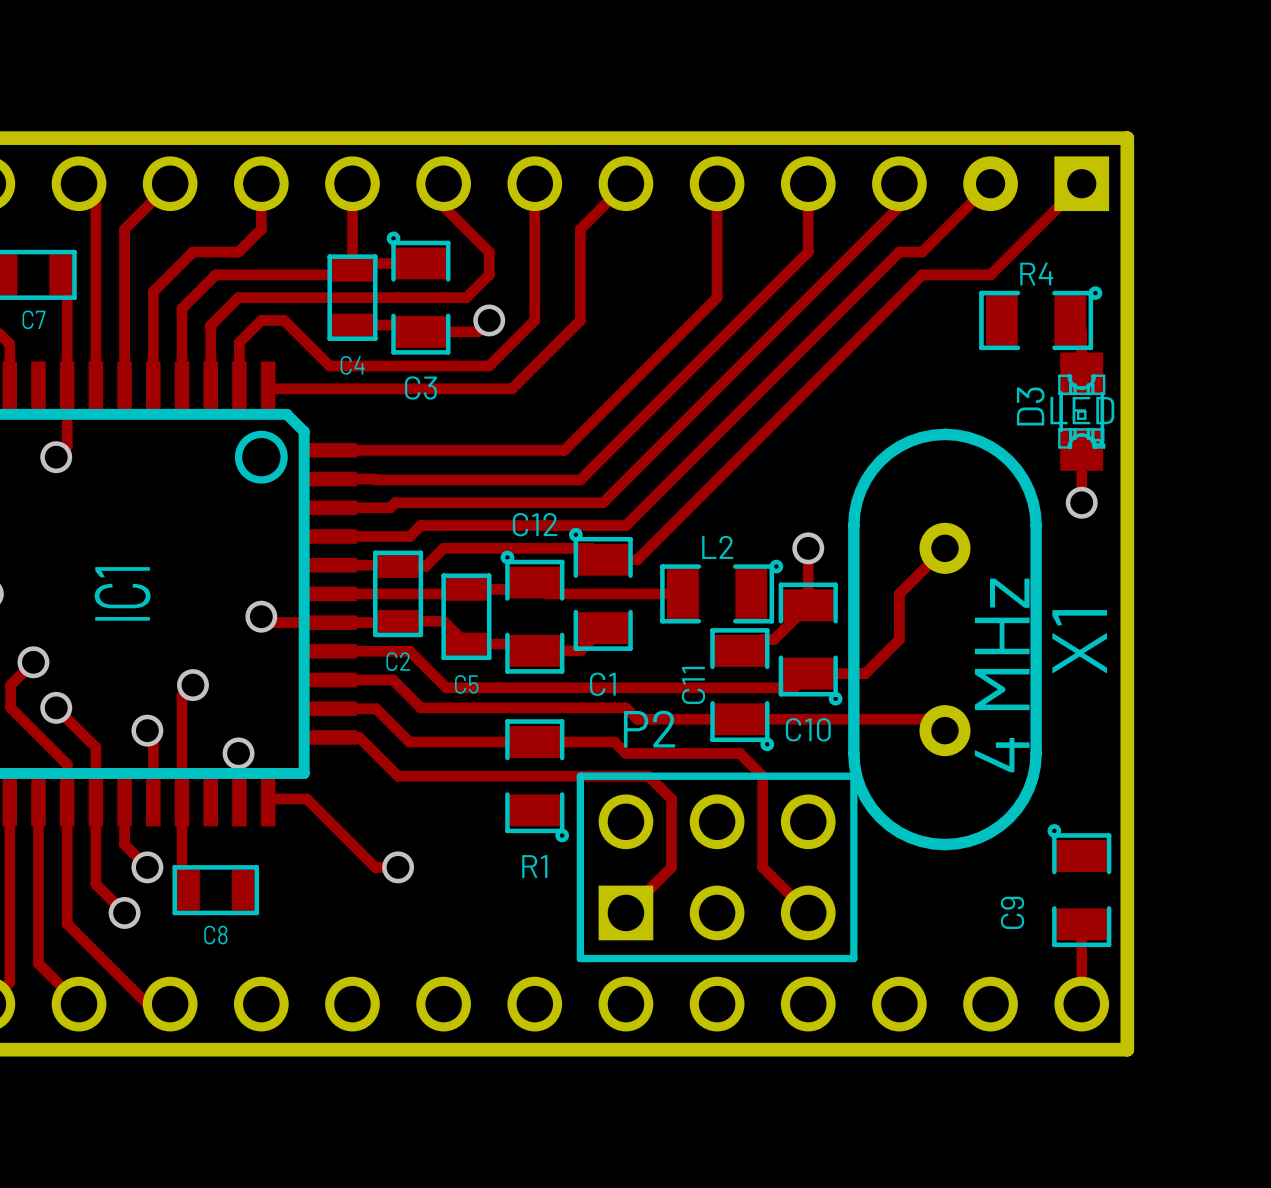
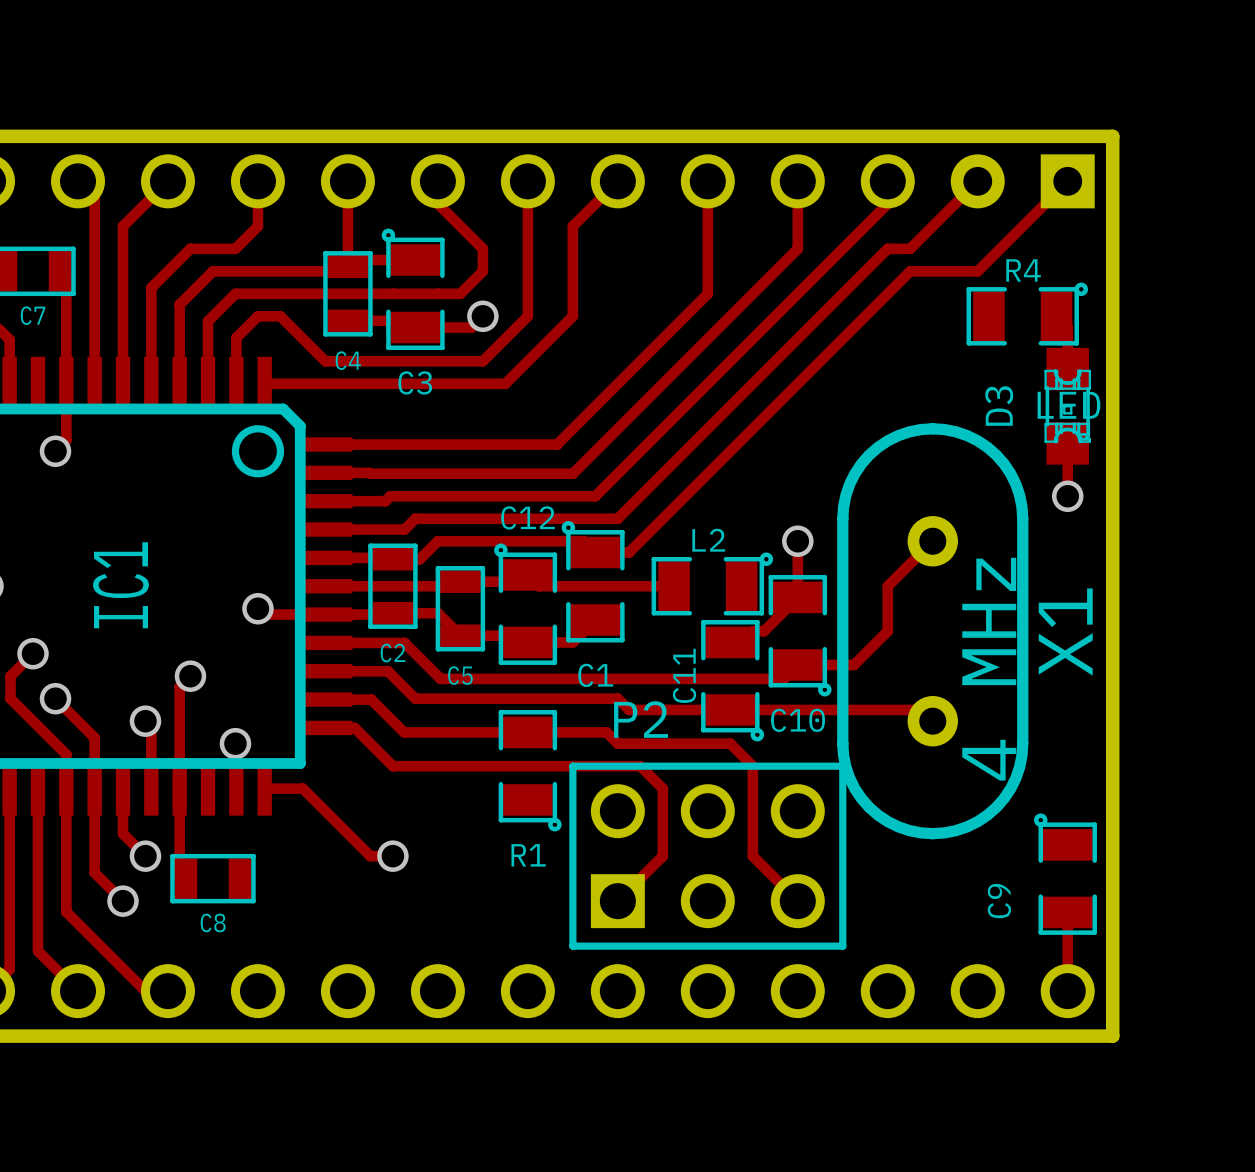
D3 name position: D3 (1030, 406) -> D3 (999, 406)

